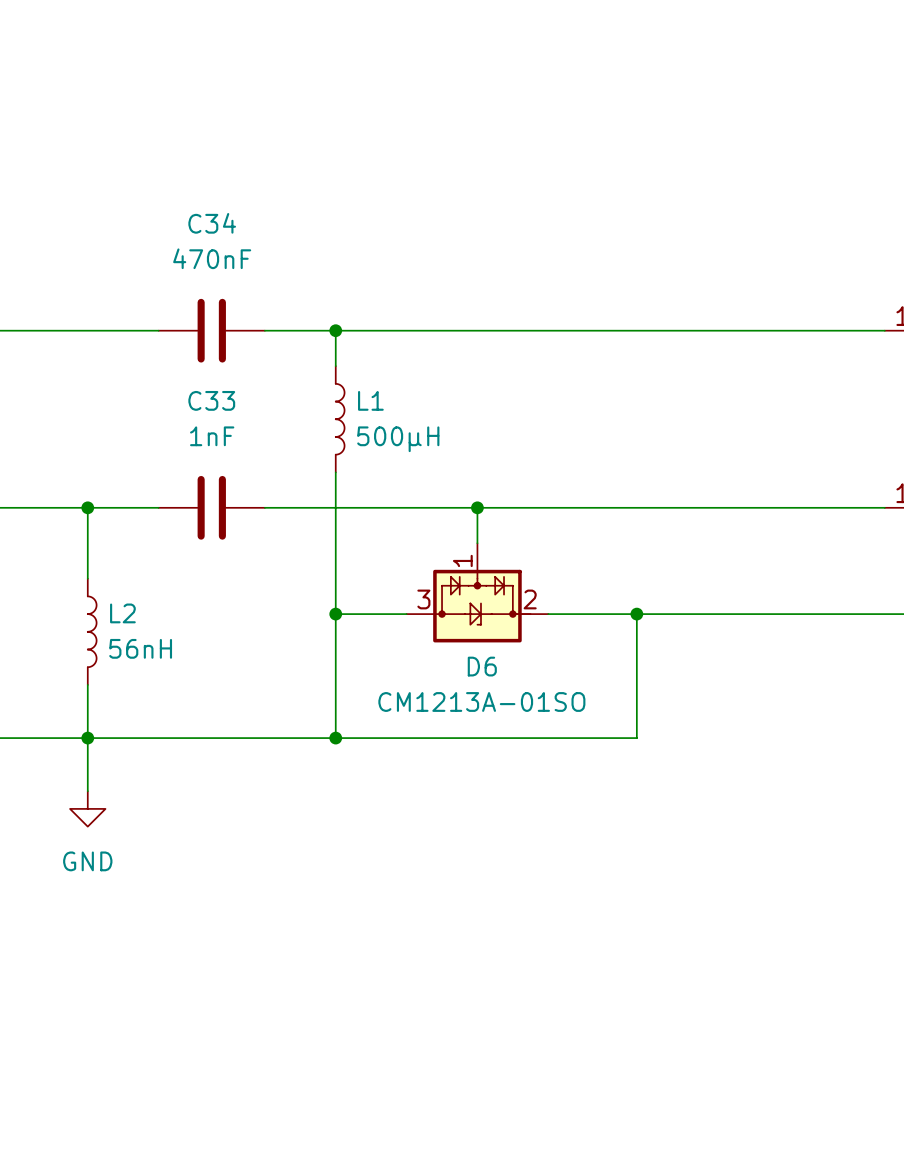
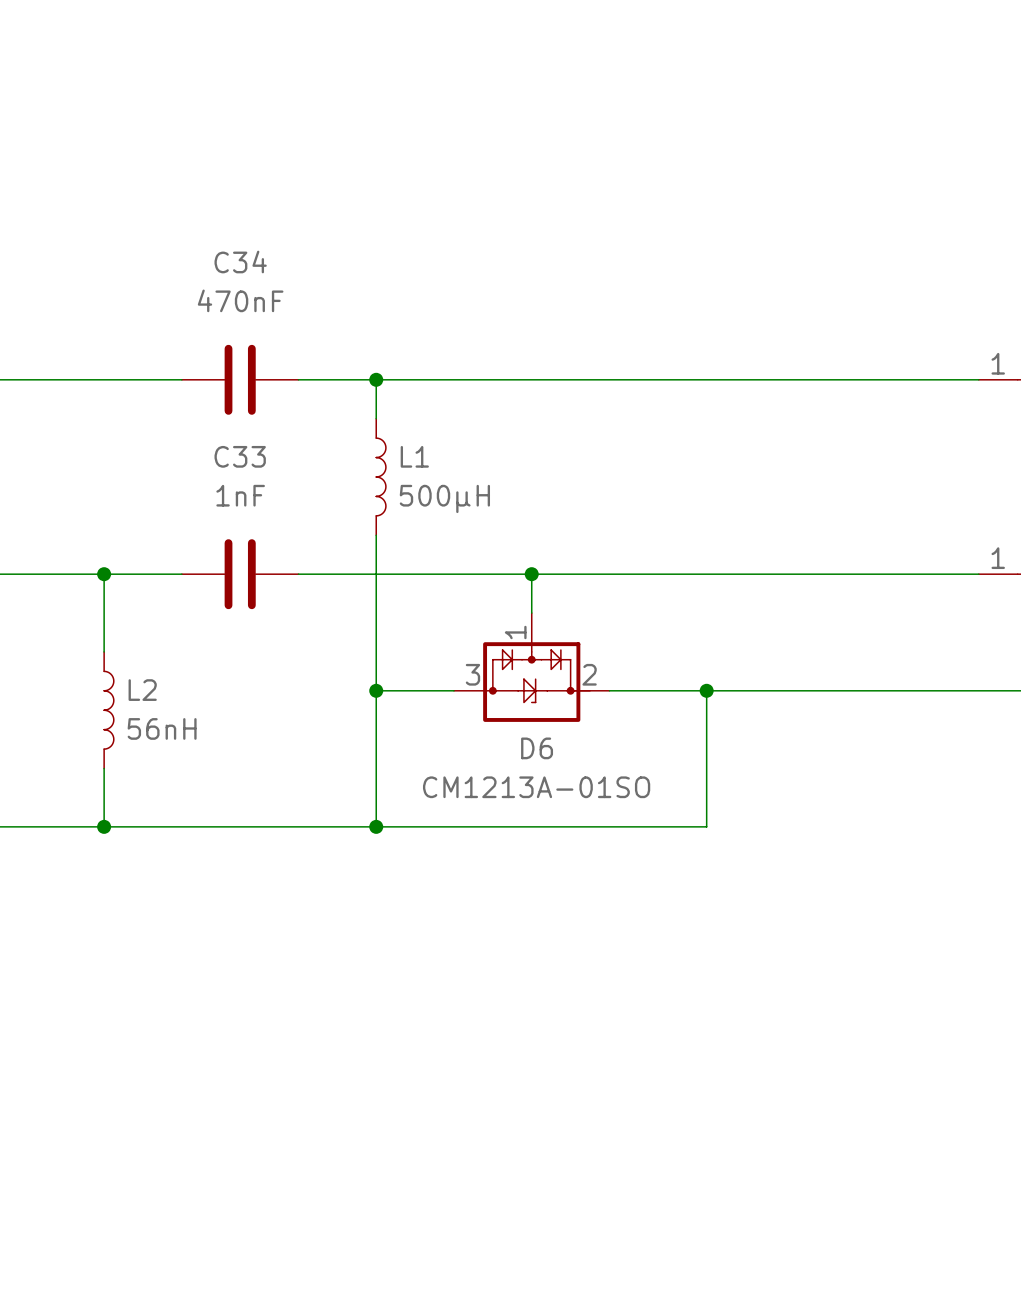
wire: (87, 738) (87, 791) -> none
power symbol: GND (87, 808) -> none

